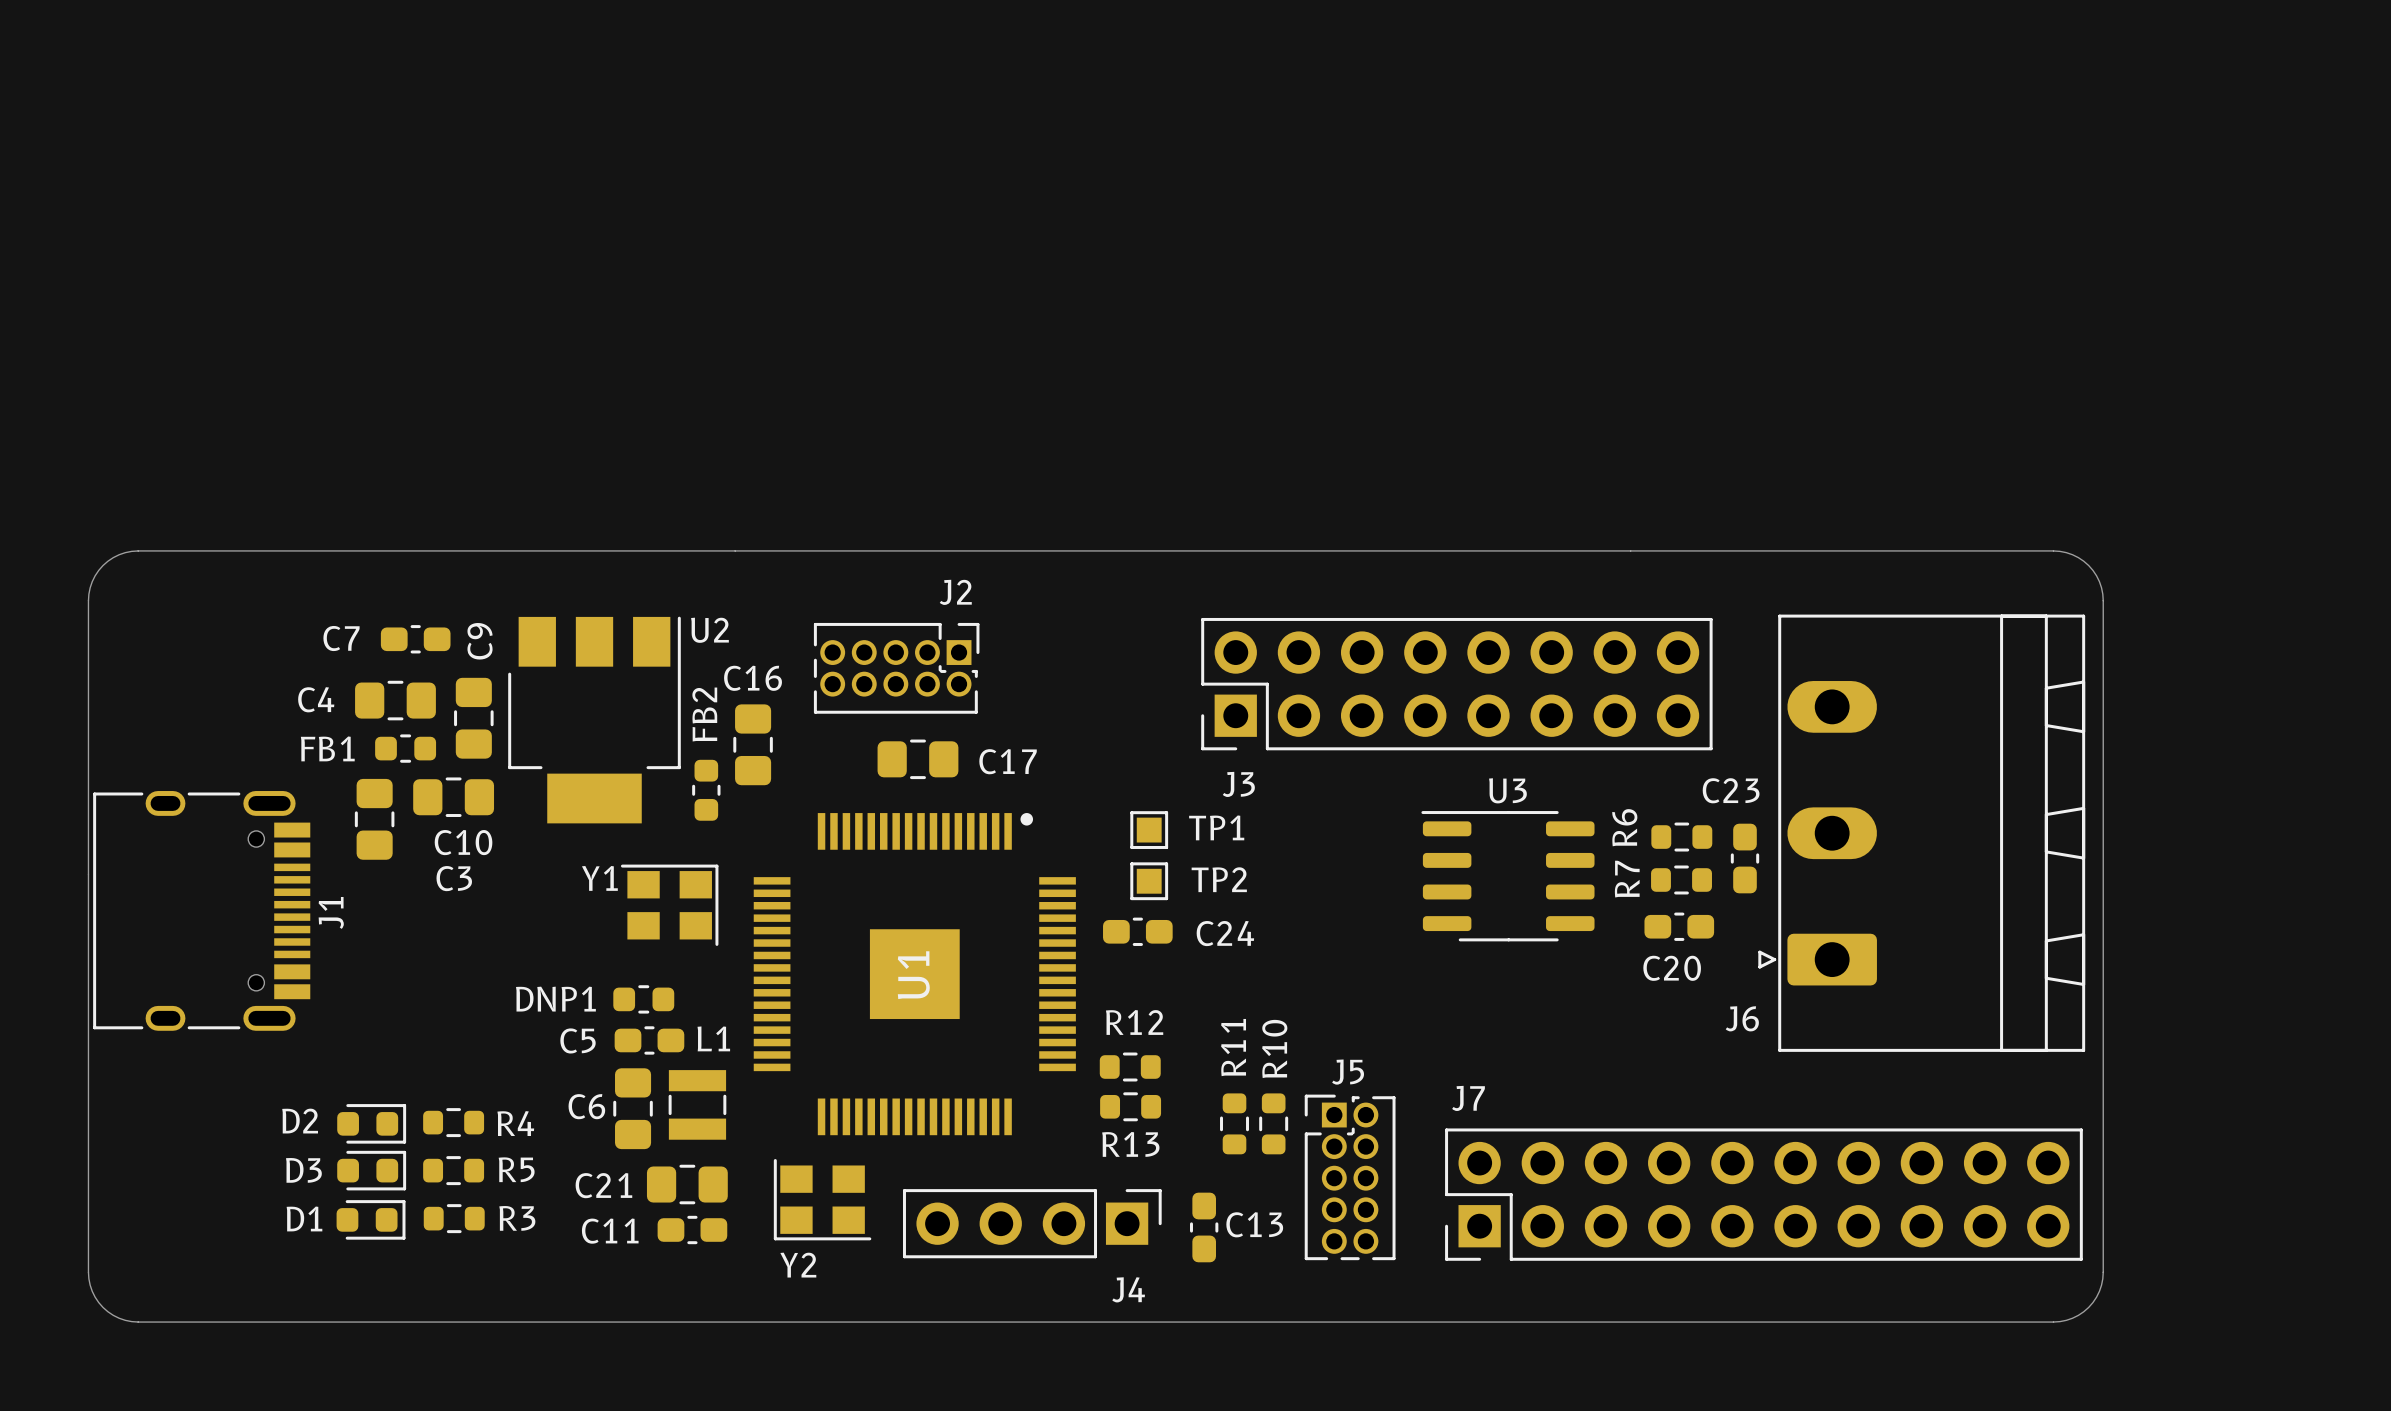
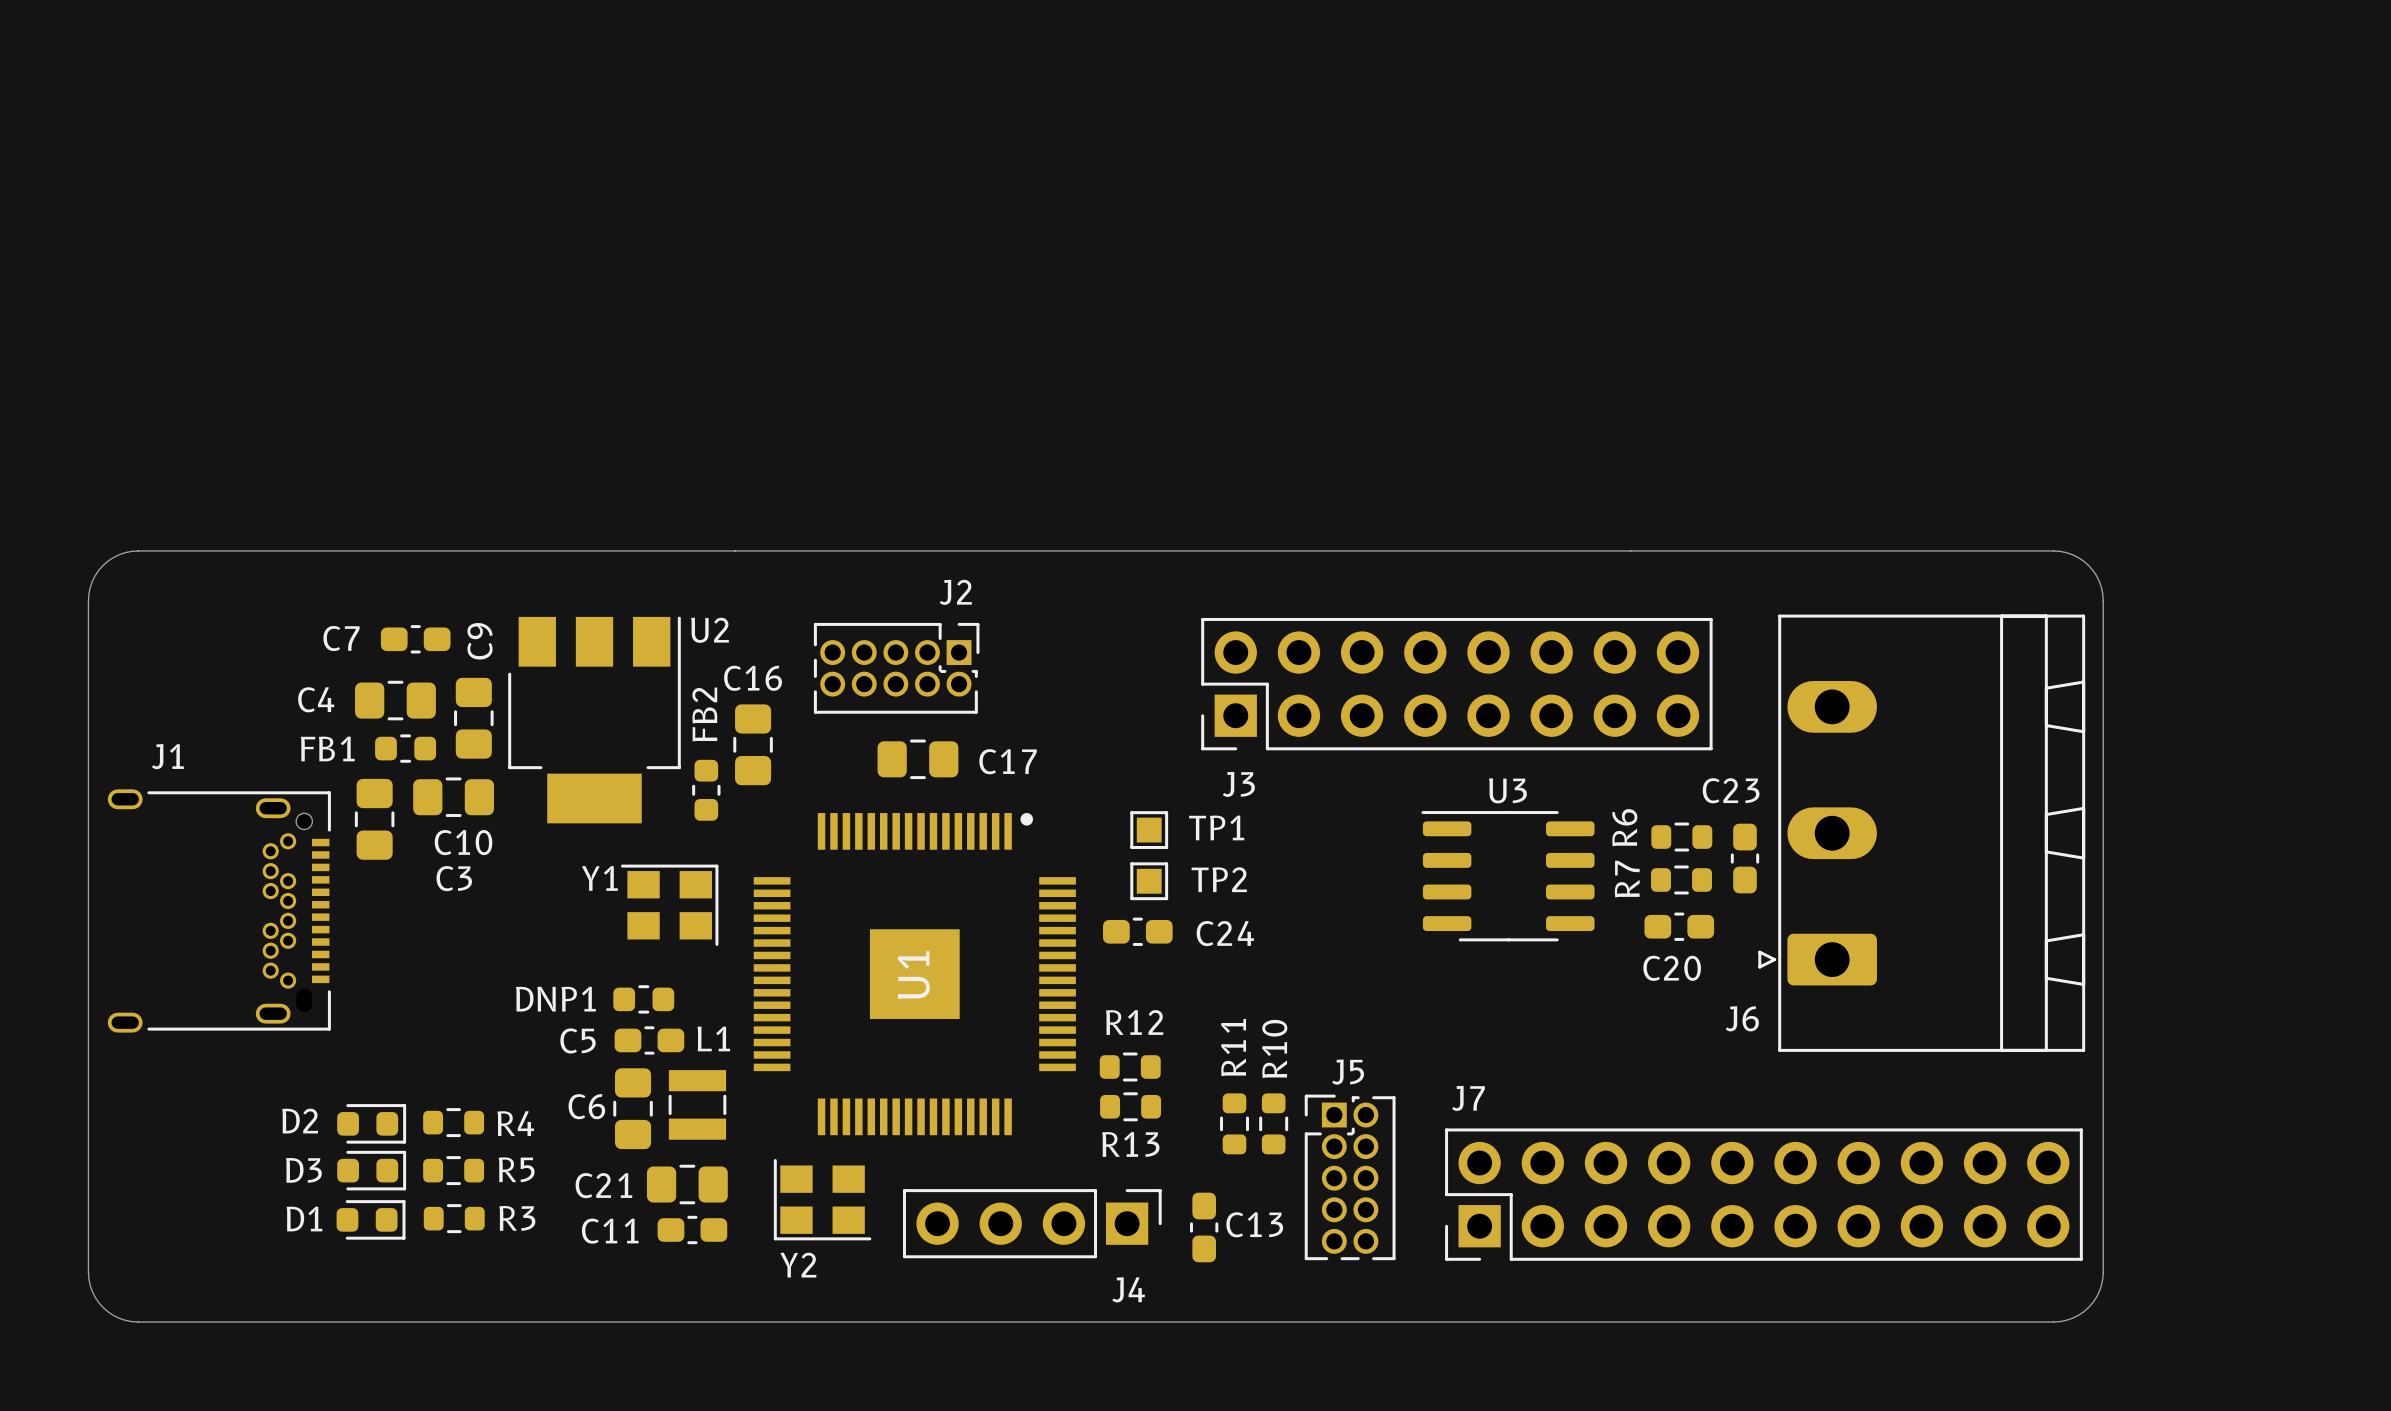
J1 footprint: [93, 791, 311, 1031] -> [107, 789, 331, 1033]
J1 name position: J1 (331, 912) -> J1 (167, 756)

